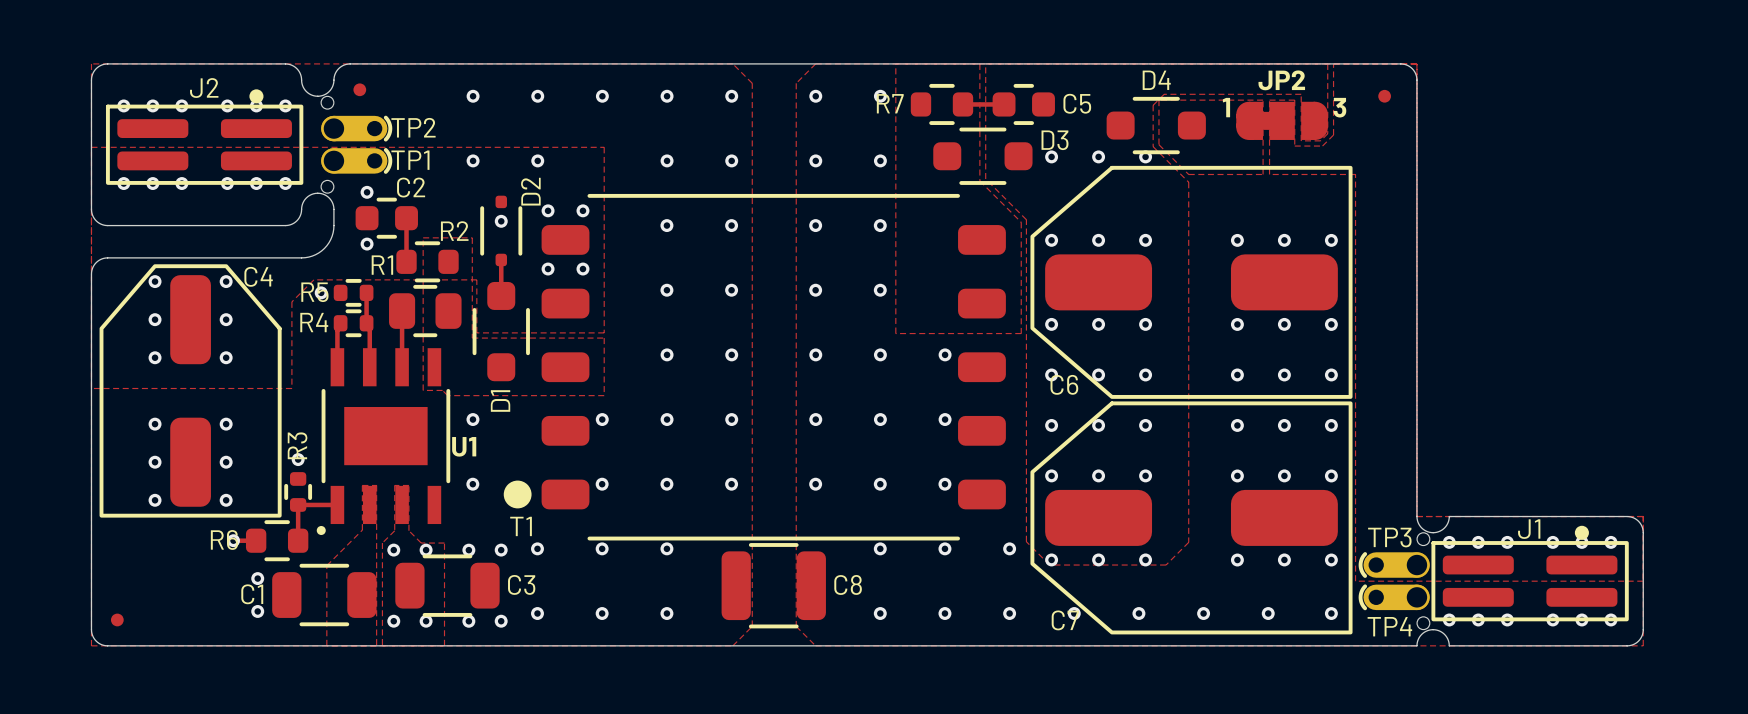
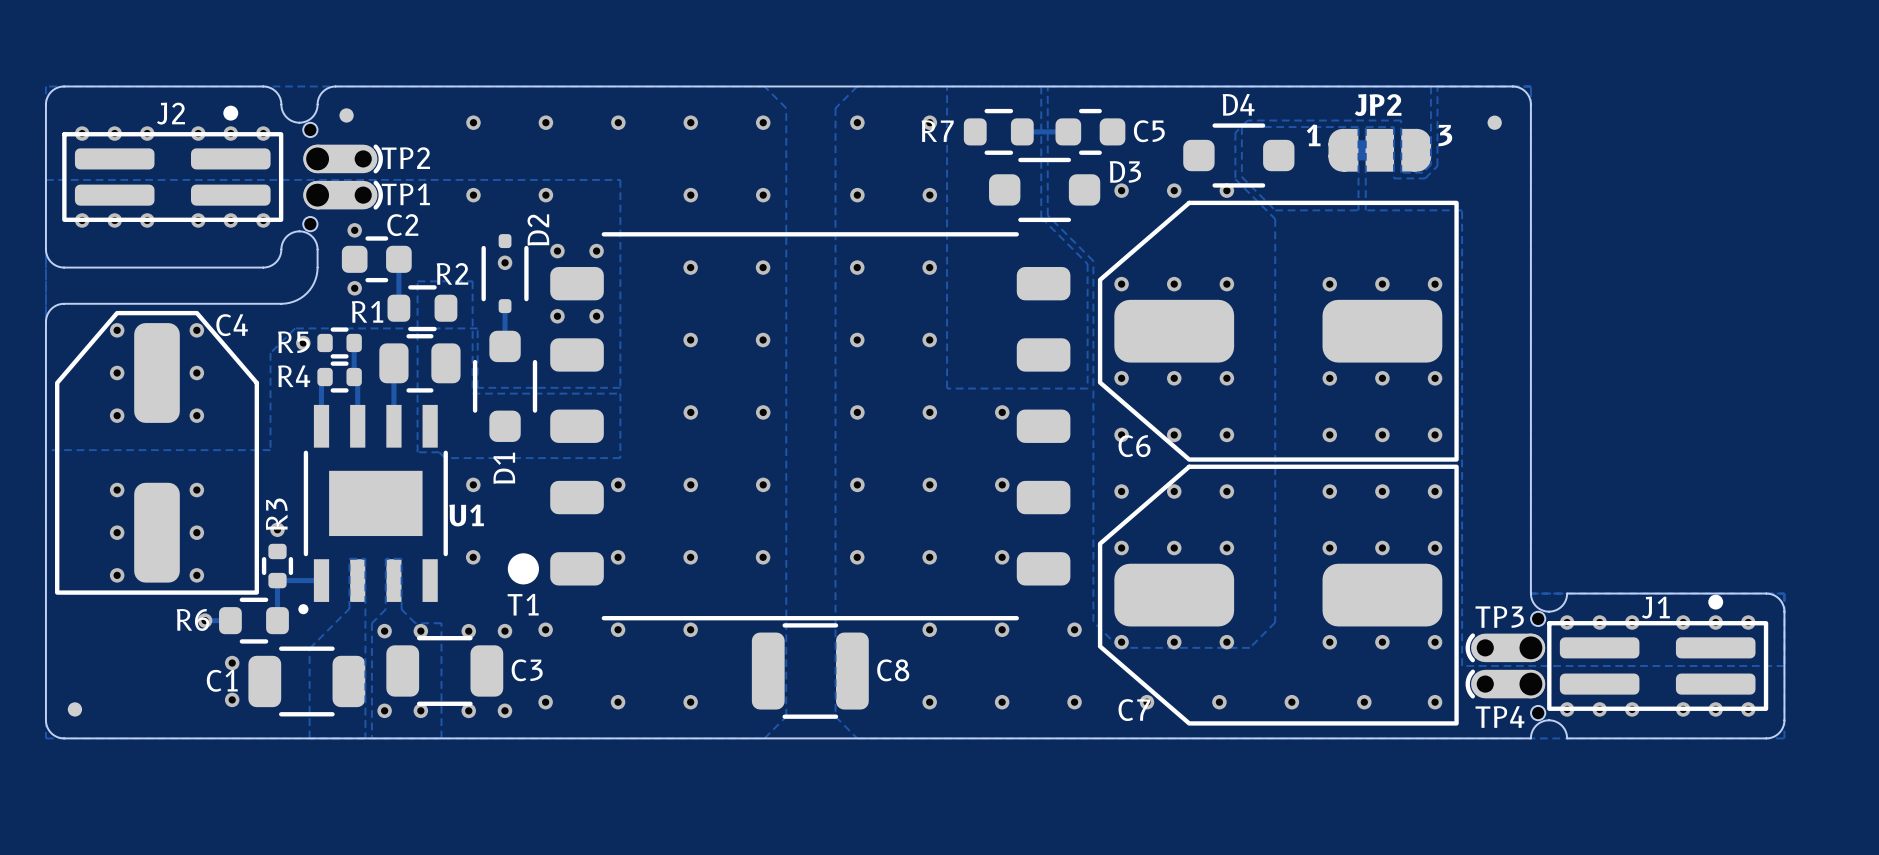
J2 footprint: [105, 89, 304, 185] -> [62, 105, 284, 222]
J1 footprint: [1431, 525, 1629, 622] -> [1547, 594, 1769, 711]

